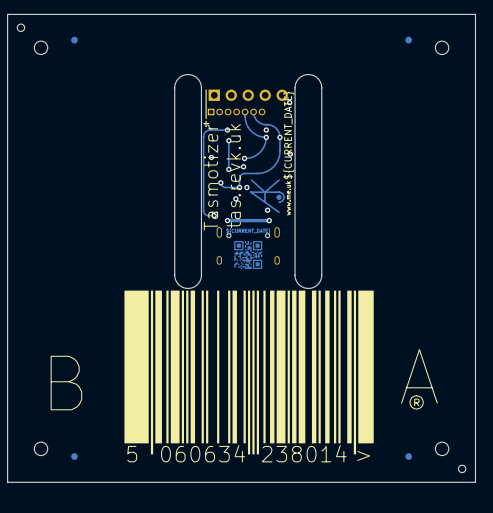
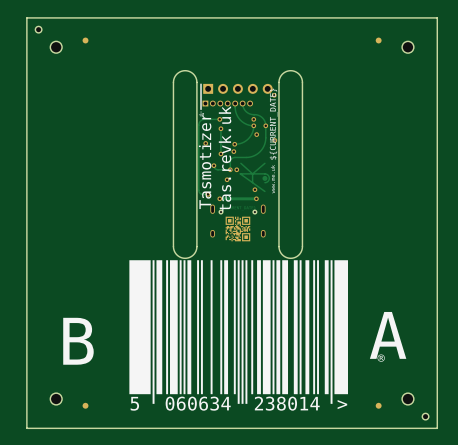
via: none -> (256, 134)

